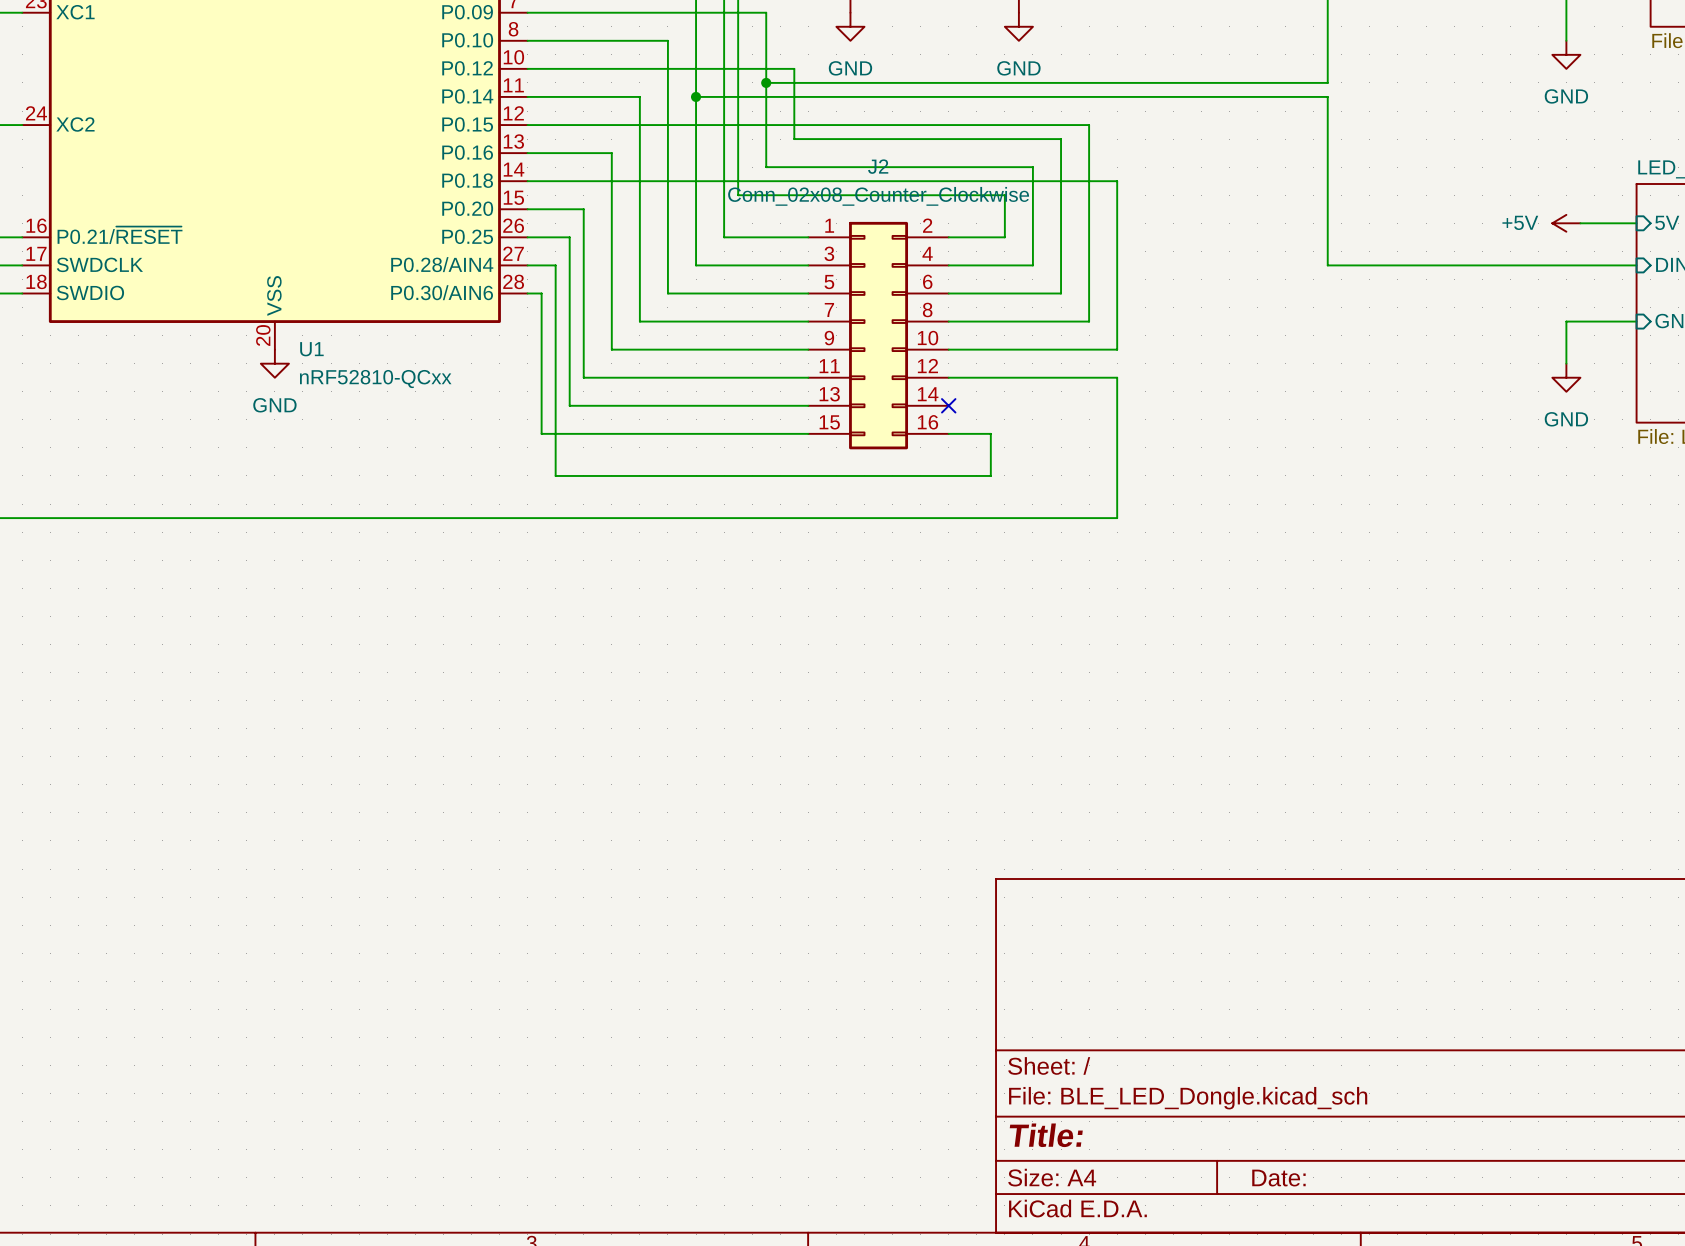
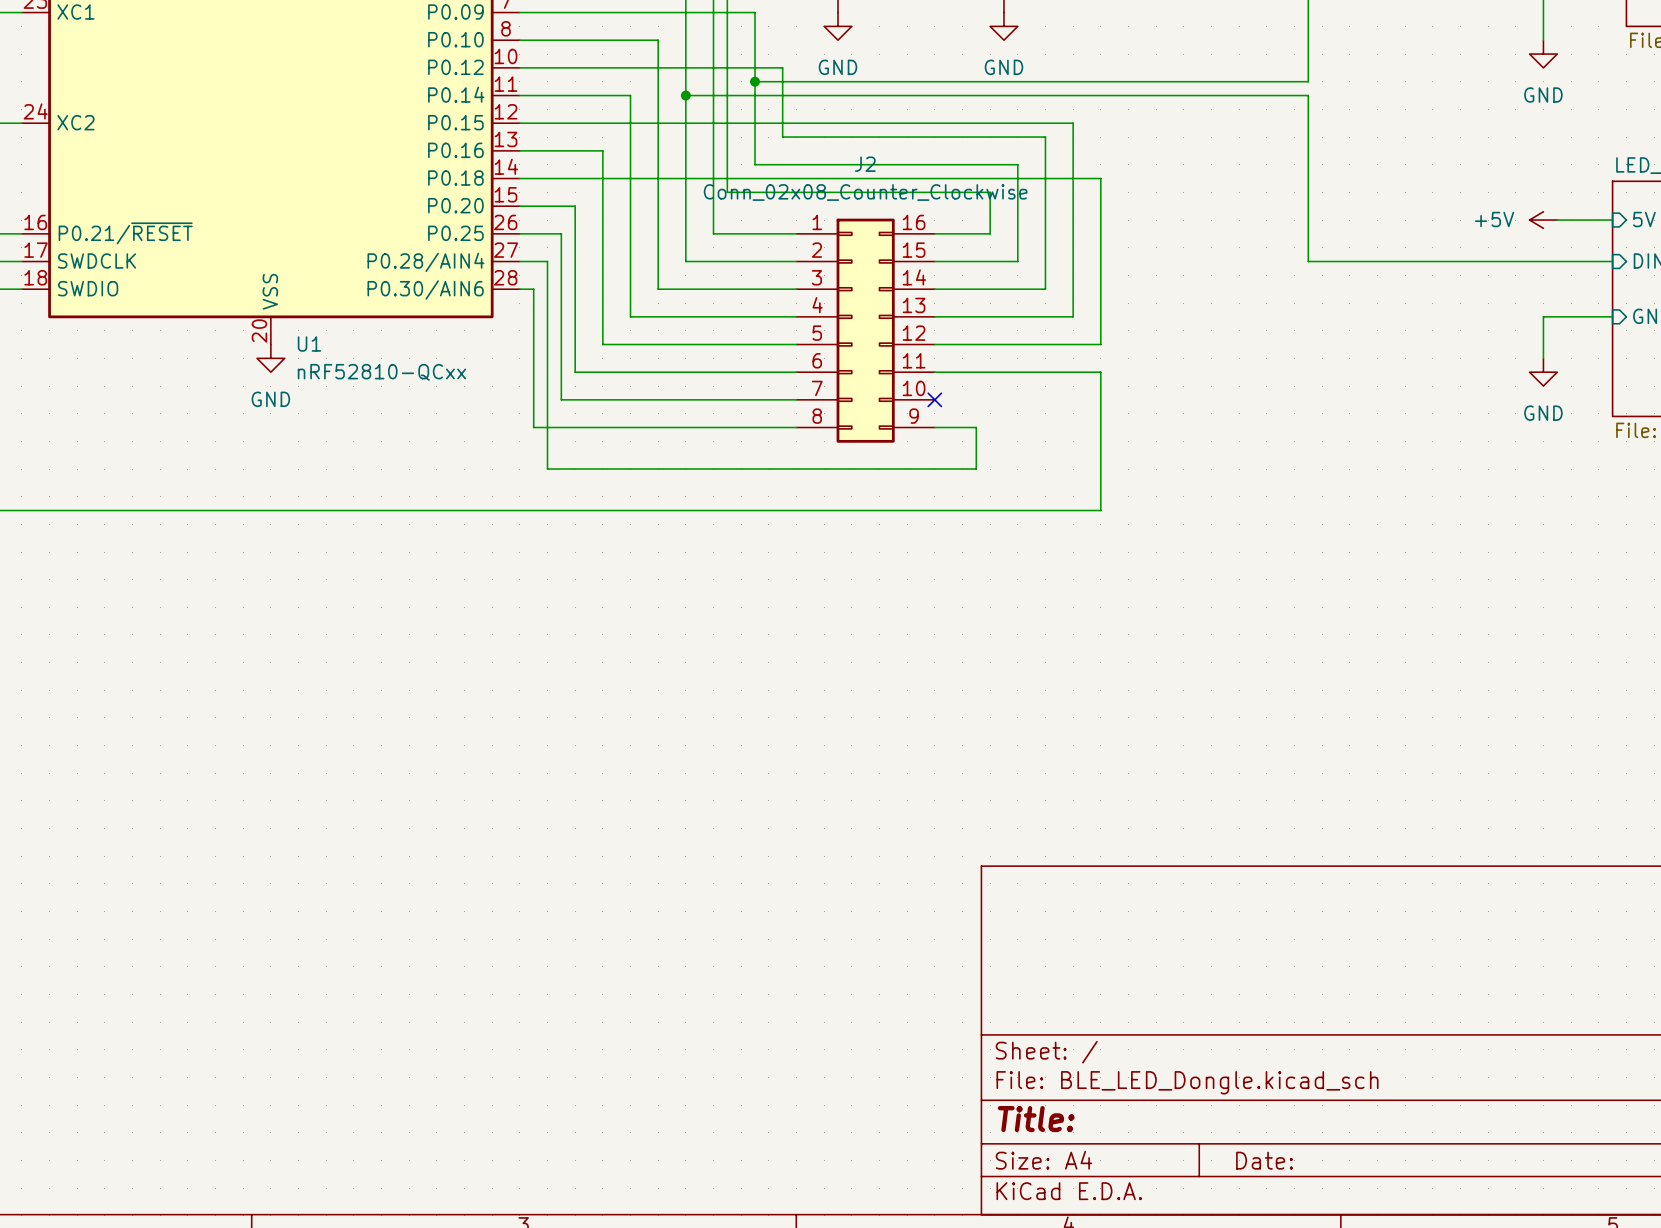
J2 symbol: [808, 221, 949, 450] -> [796, 218, 935, 443]

